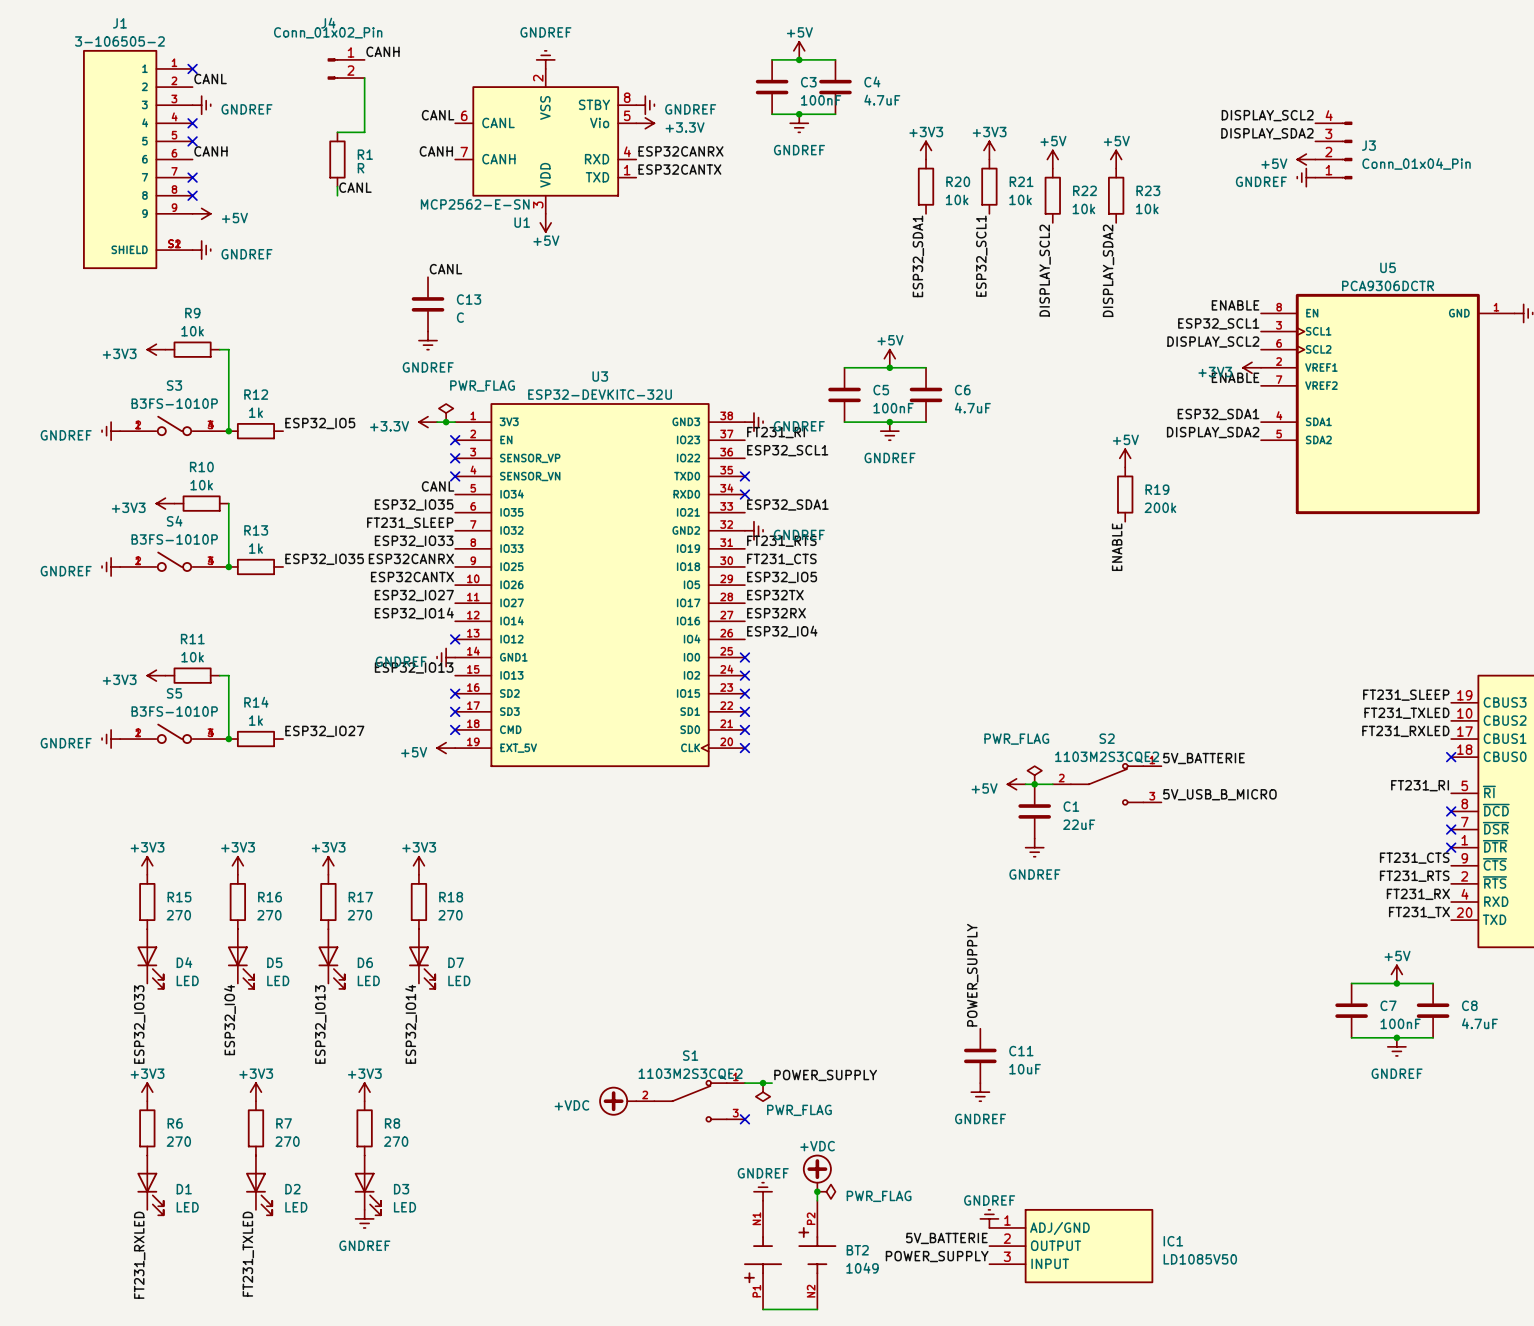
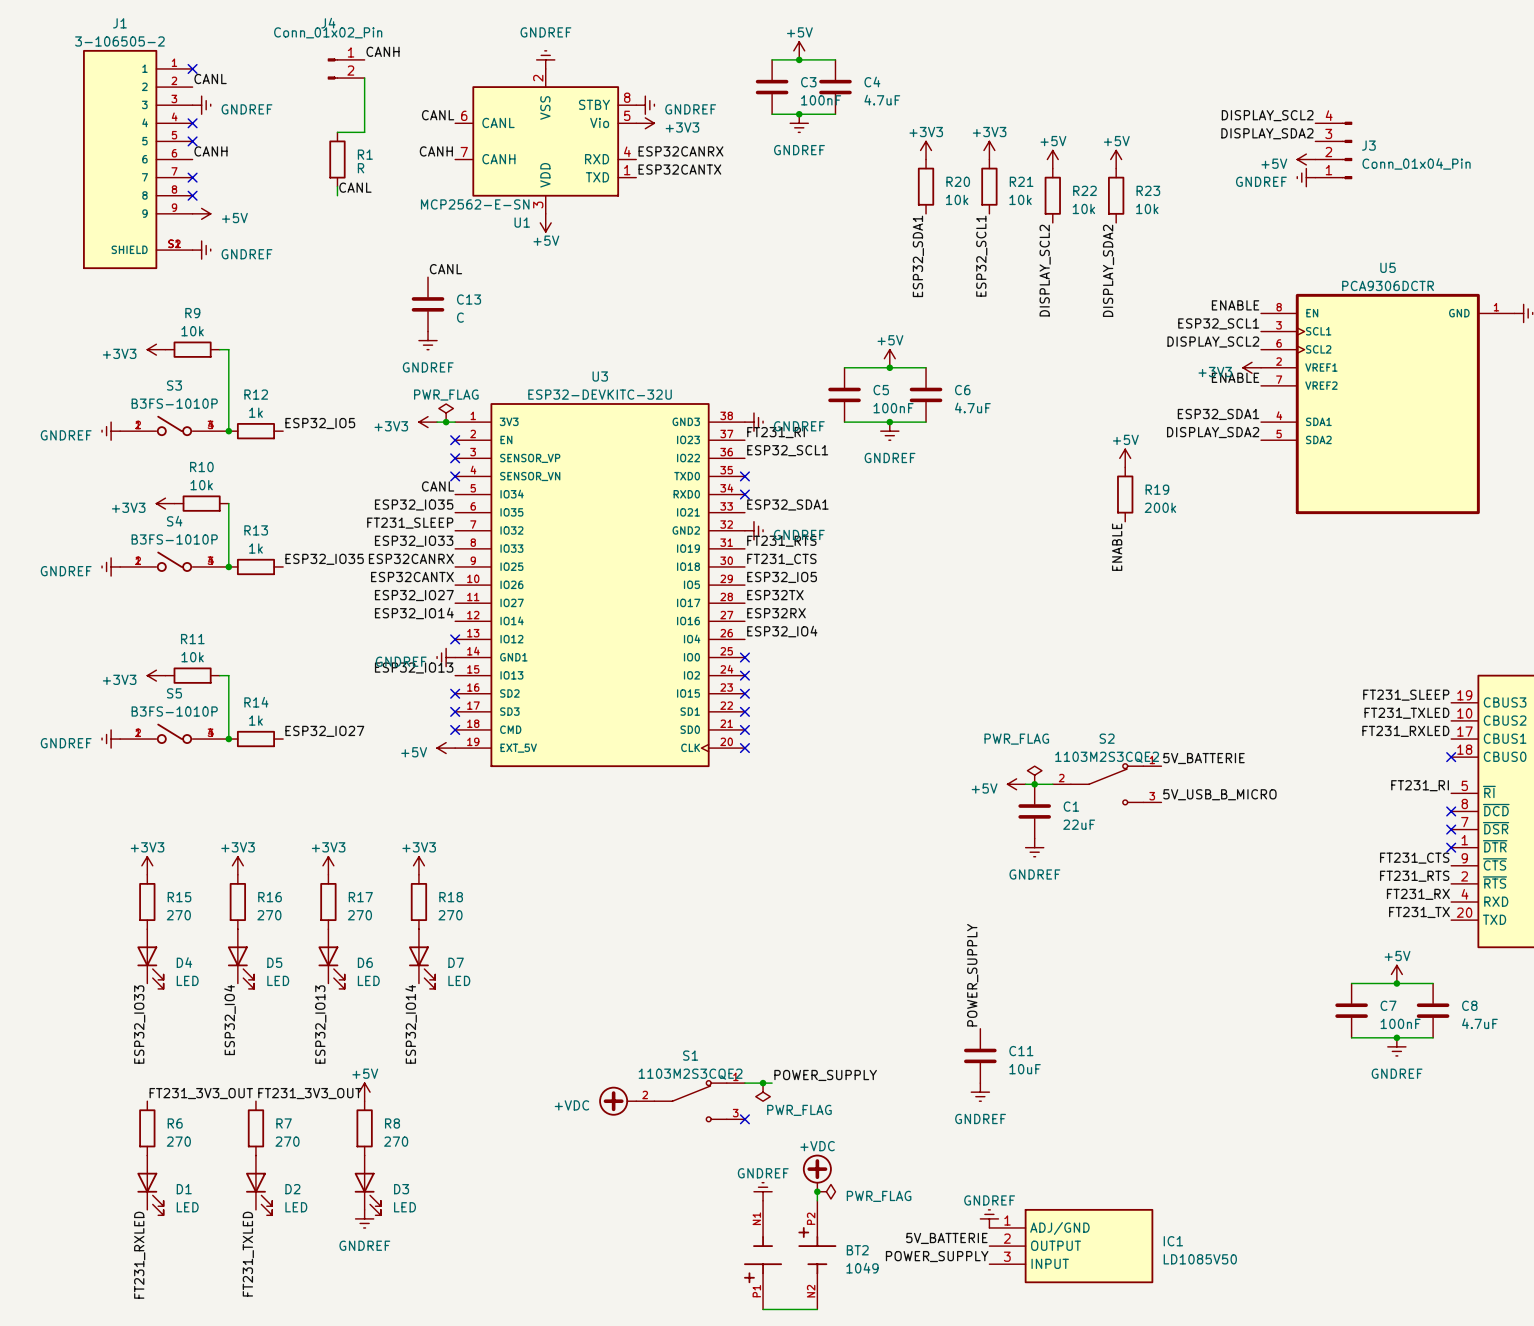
power symbol: +3.3V (645, 123) -> +3V3 (645, 123)
power symbol text position: PWR_FLAG (482, 385) -> PWR_FLAG (446, 395)
power symbol: +3.3V (428, 422) -> +3V3 (428, 422)
power symbol: +3V3 (147, 1092) -> none
power symbol: +3V3 (255, 1092) -> none
power symbol: +3V3 (364, 1092) -> +5V (364, 1092)
label: none -> FT231_3V3_OUT (201, 1093)
label: none -> FT231_3V3_OUT (309, 1093)

